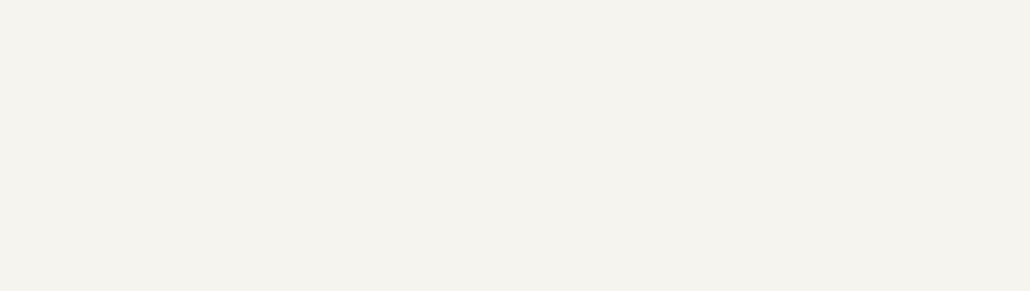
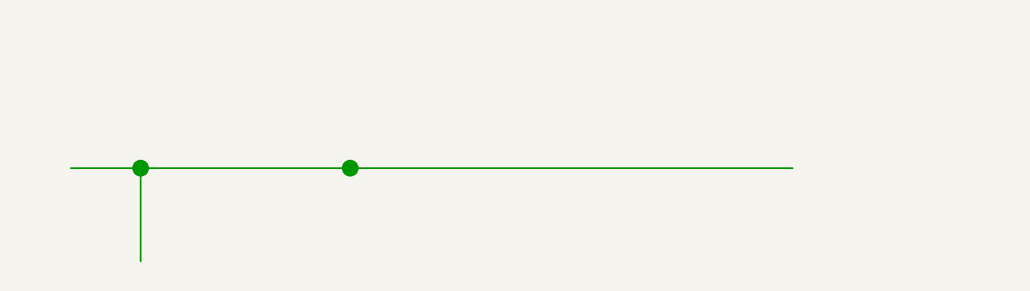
wire: none -> (70, 168) (792, 168)
wire: none -> (140, 168) (140, 261)
junction: none -> (140, 168)
junction: none -> (350, 168)

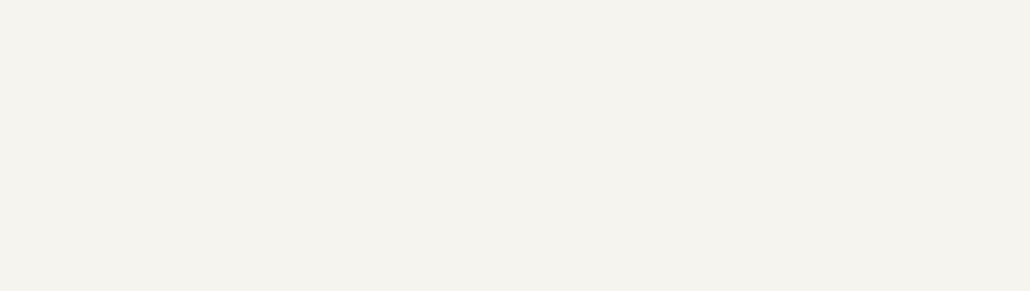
wire: (70, 168) (792, 168) -> none
wire: (140, 168) (140, 261) -> none
junction: (140, 168) -> none
junction: (350, 168) -> none

